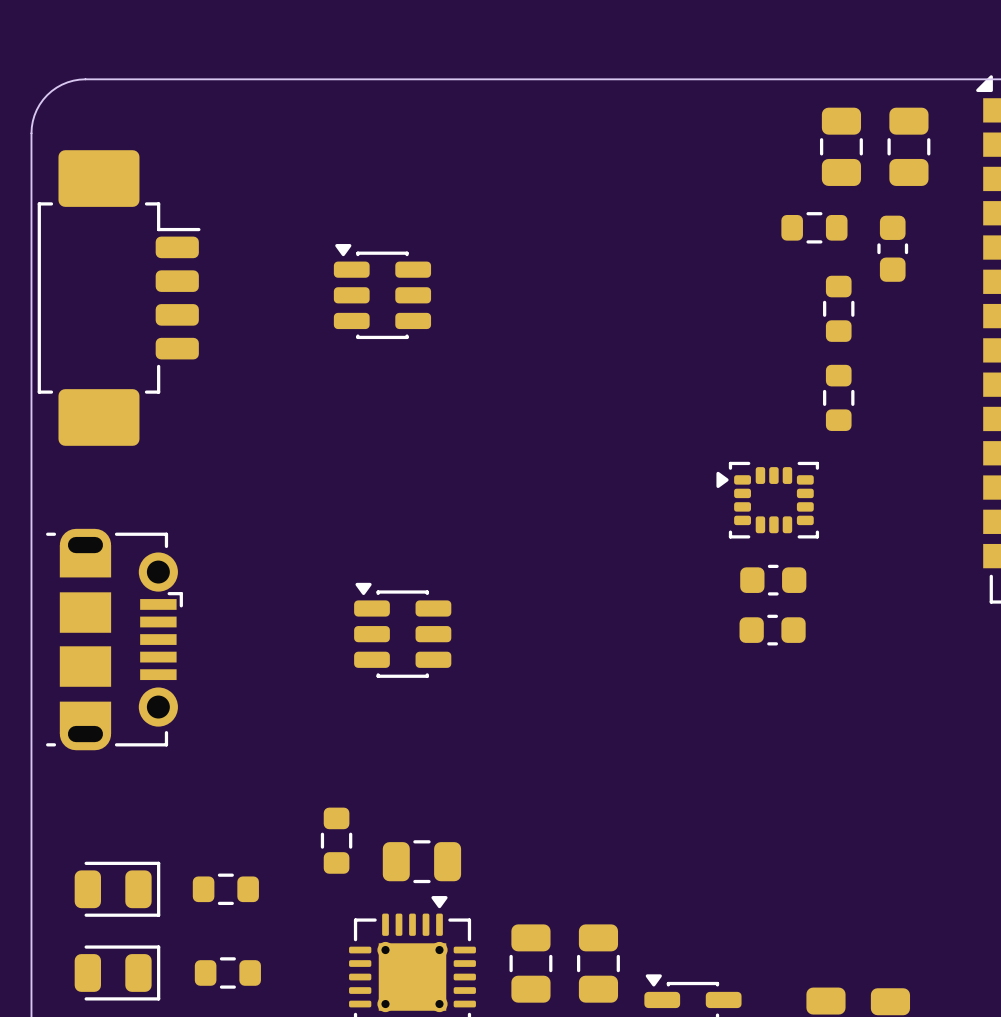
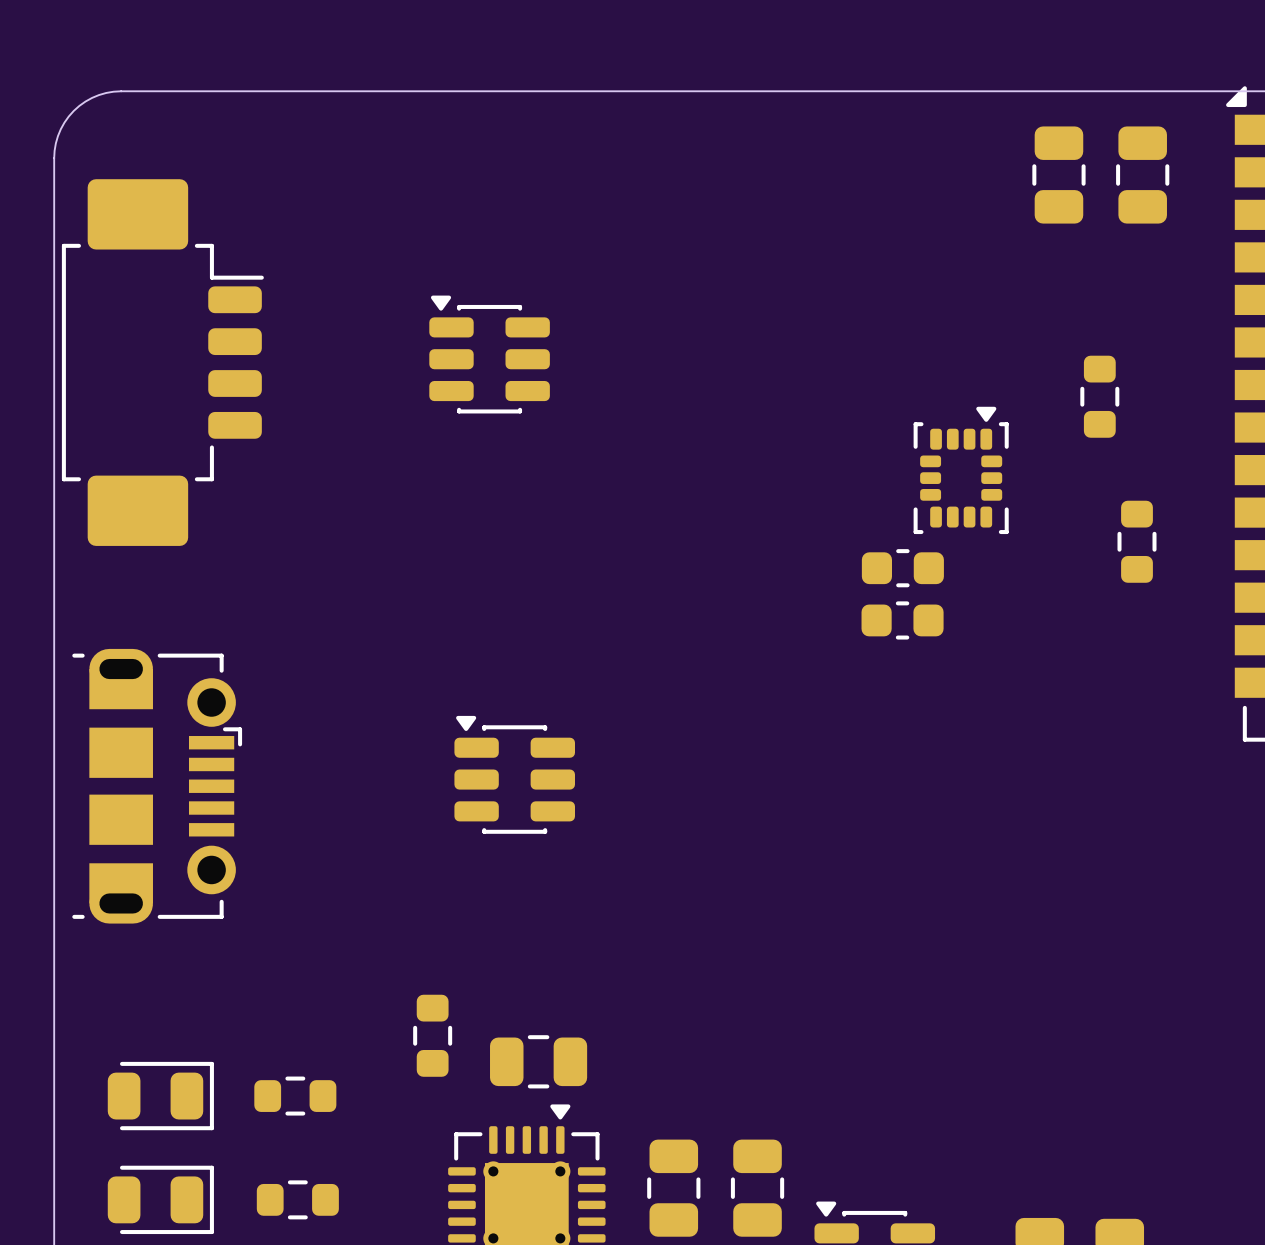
part: (814, 227) -> none
part: (892, 248) -> none
part position: (838, 308) -> (1099, 396)
part: (838, 397) -> none
part: none -> (1137, 541)
part: none -> (902, 568)
part rotation: 0° (767, 500) -> 90° clockwise (961, 470)
part position: (767, 500) -> (961, 470)
part: none -> (902, 620)
part: (773, 580) -> none
part: (772, 630) -> none

